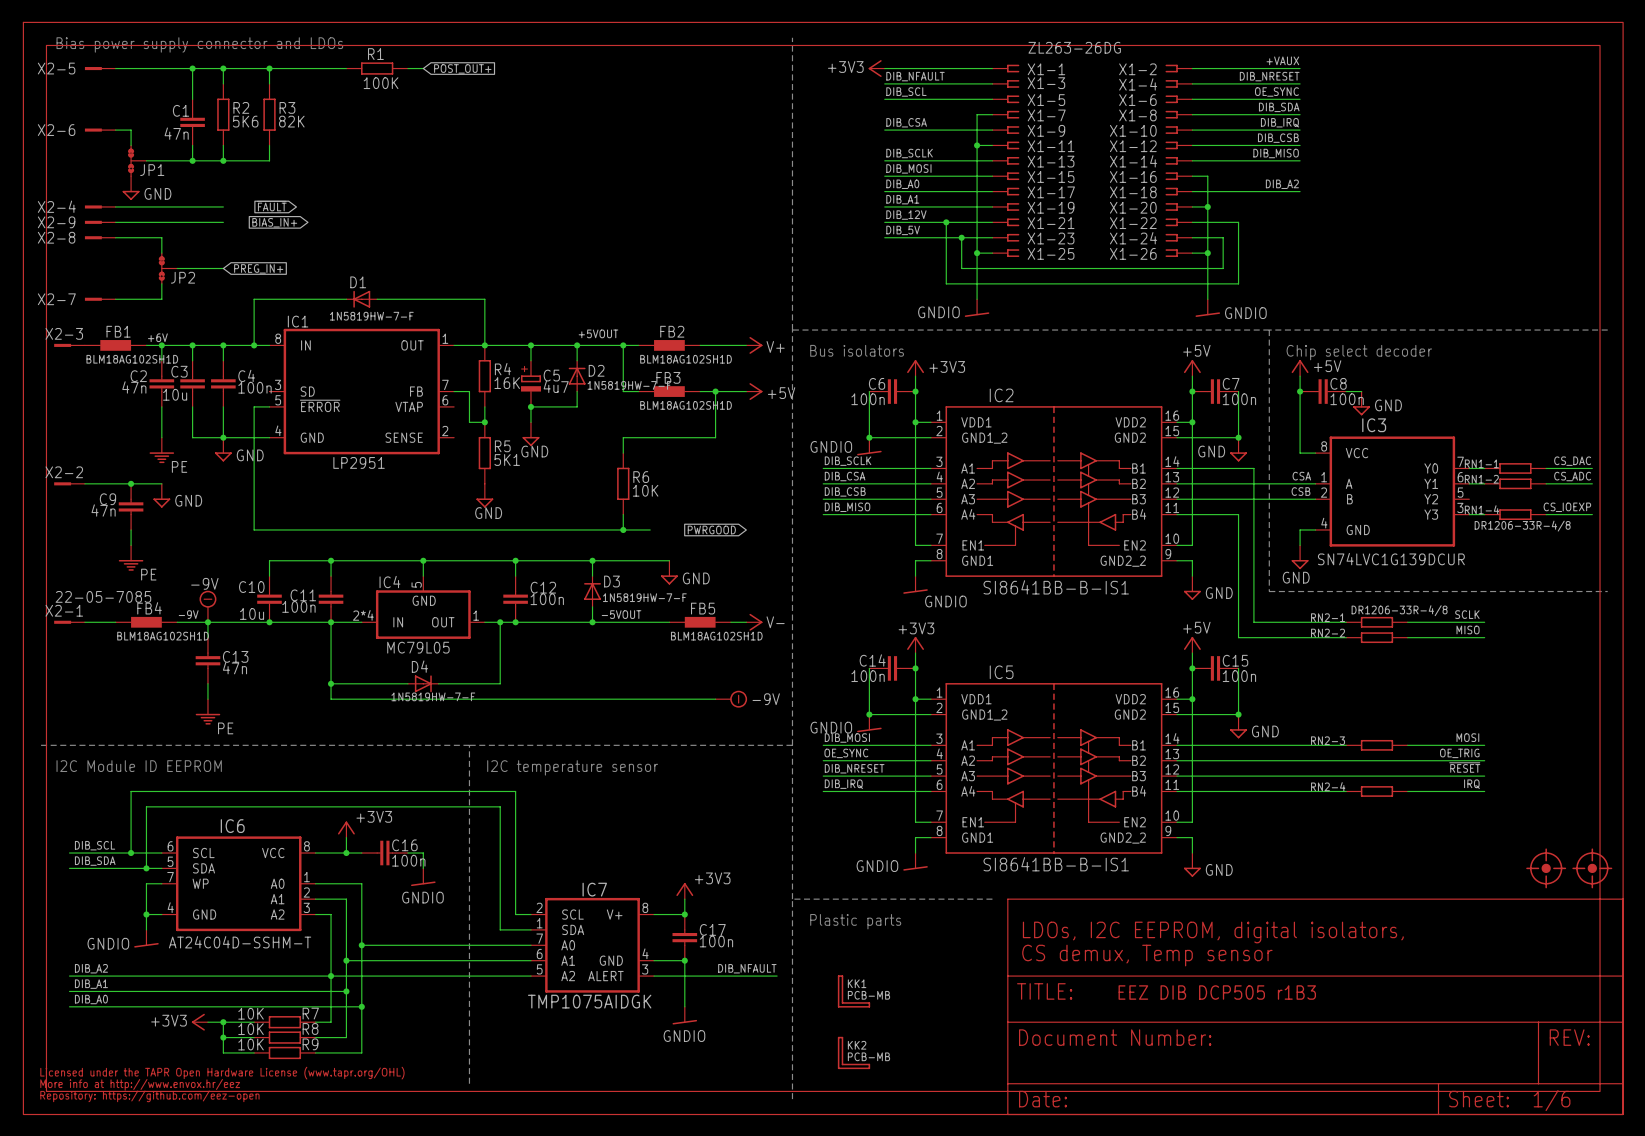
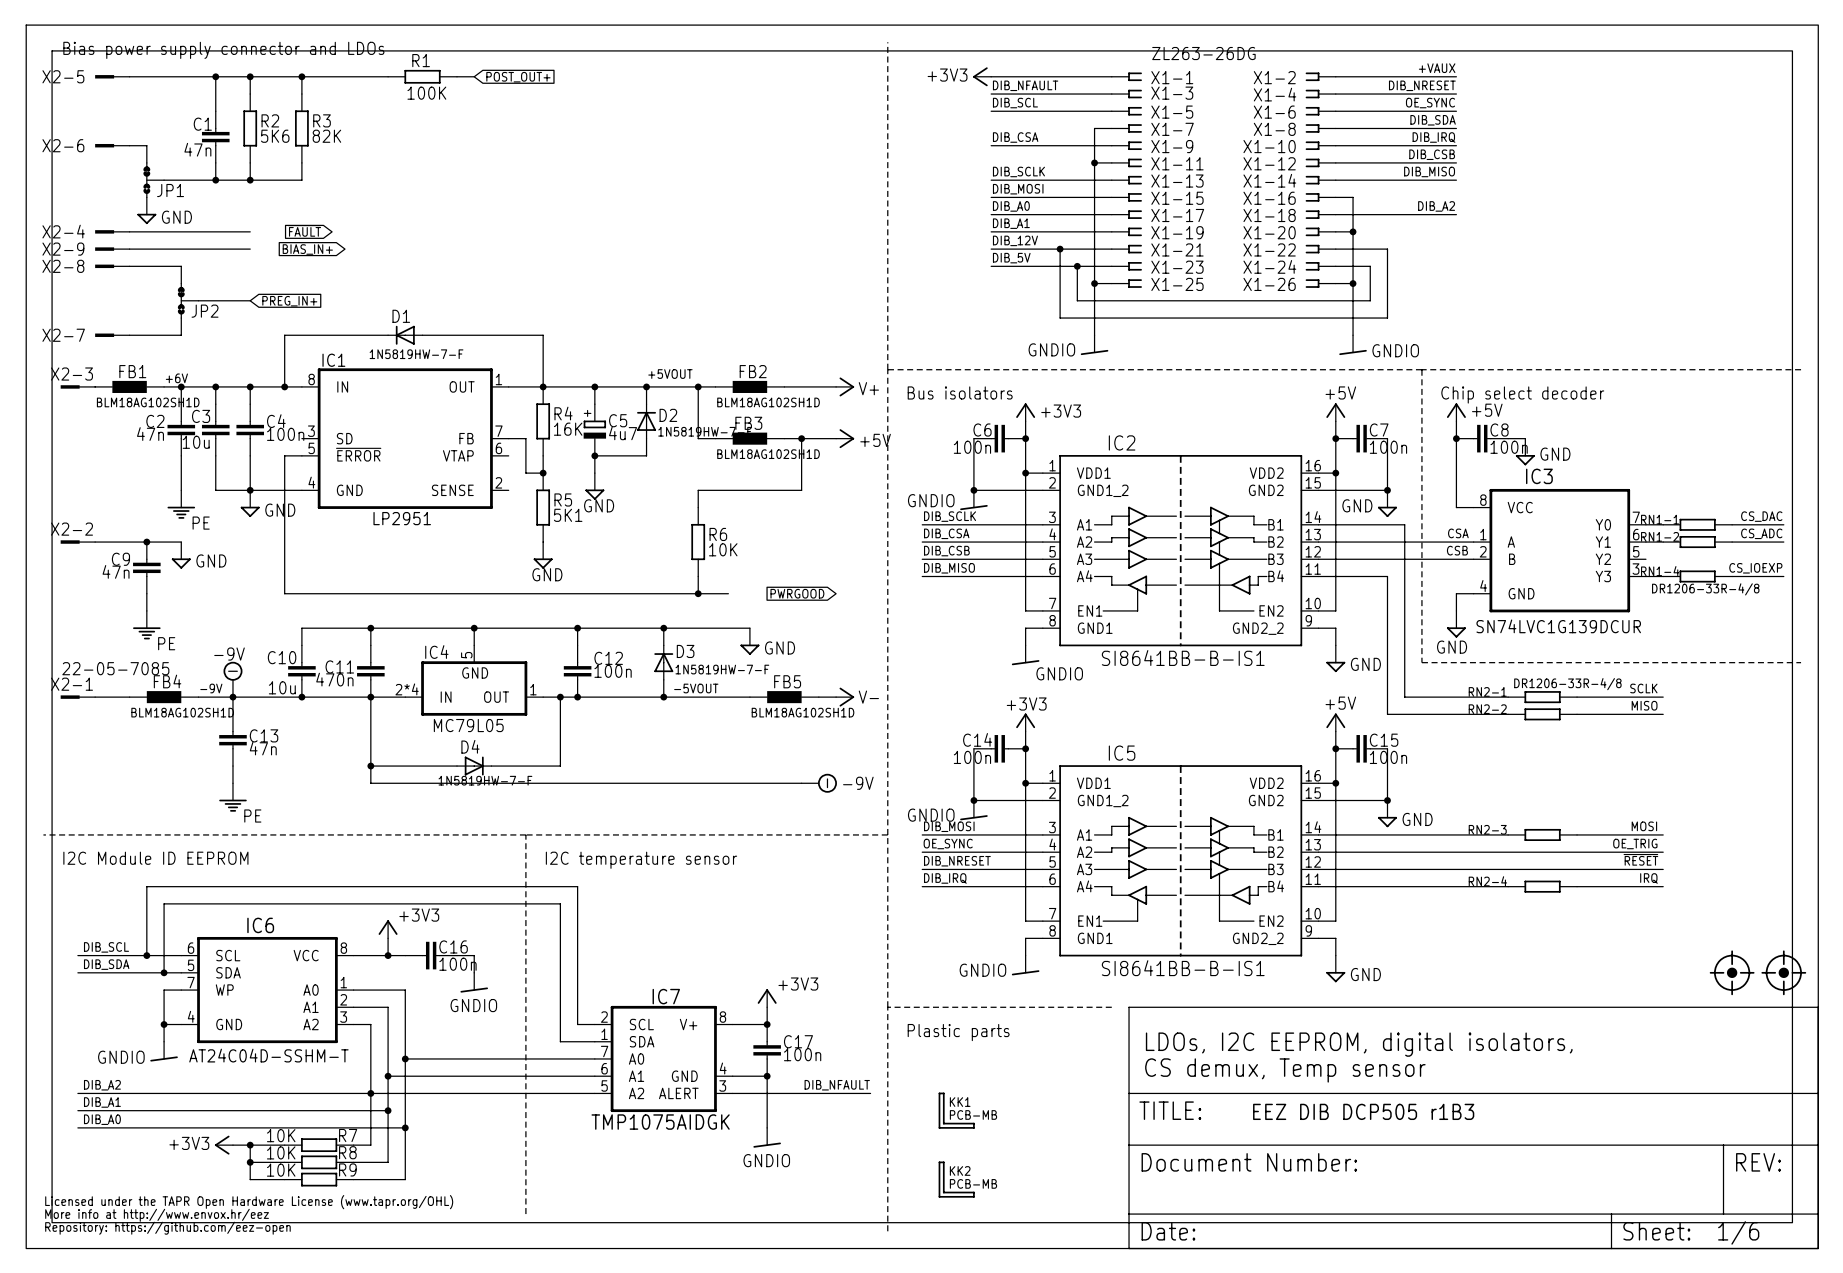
C11 value: 100n (298, 606) -> 470n (334, 679)

